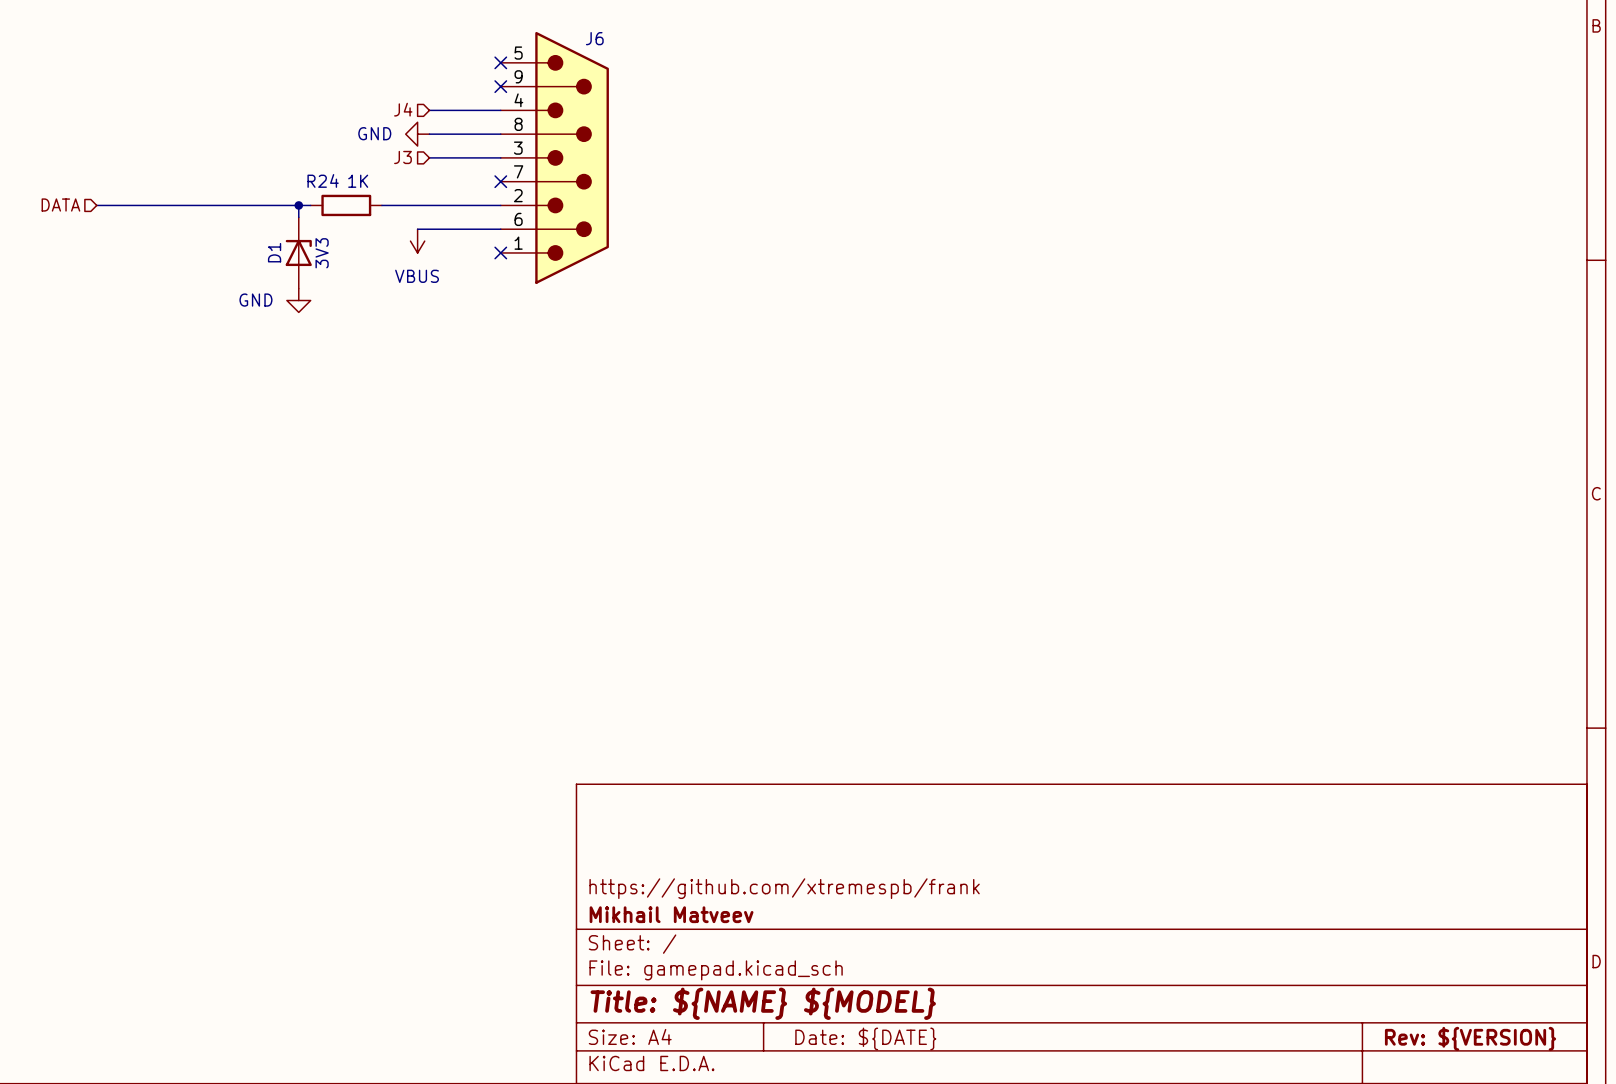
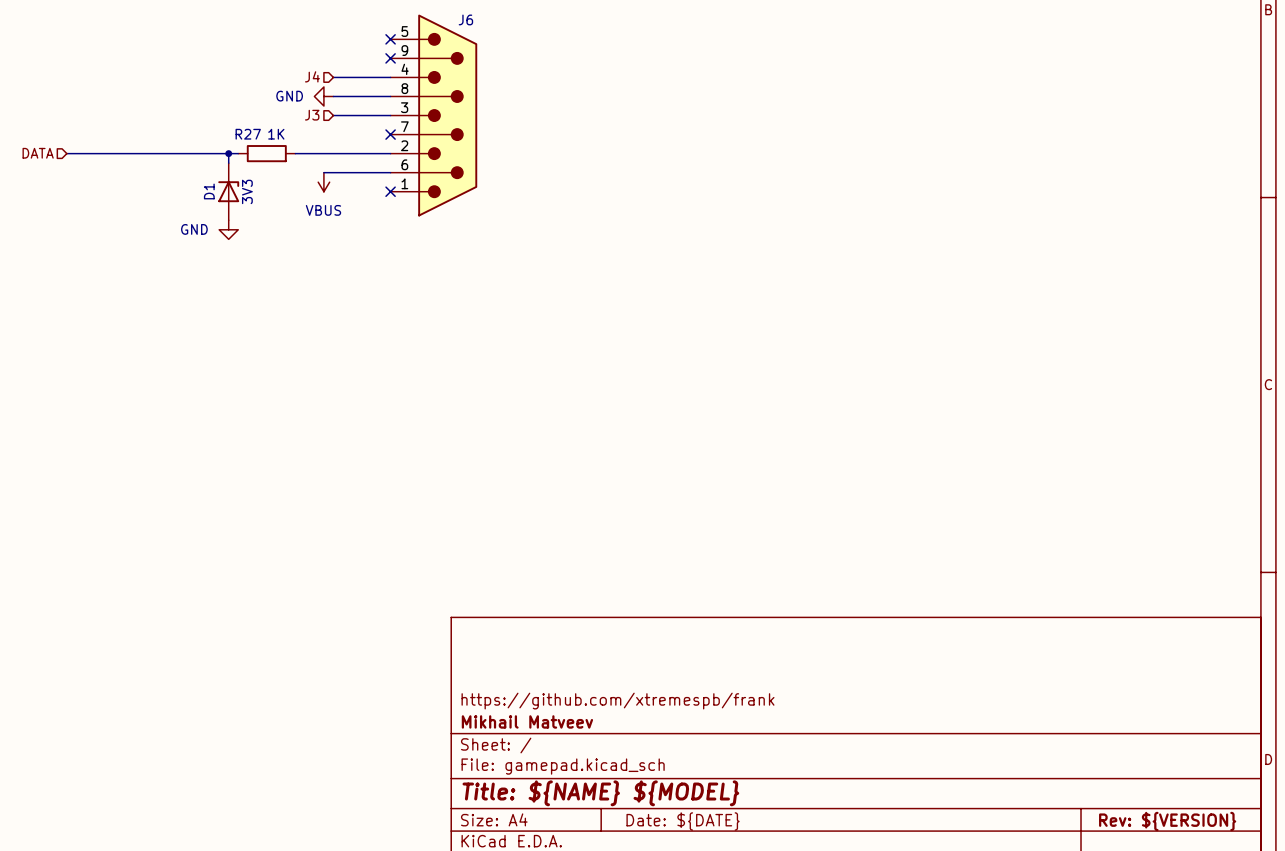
R24 name: R24 (323, 180) -> R27 (248, 134)

